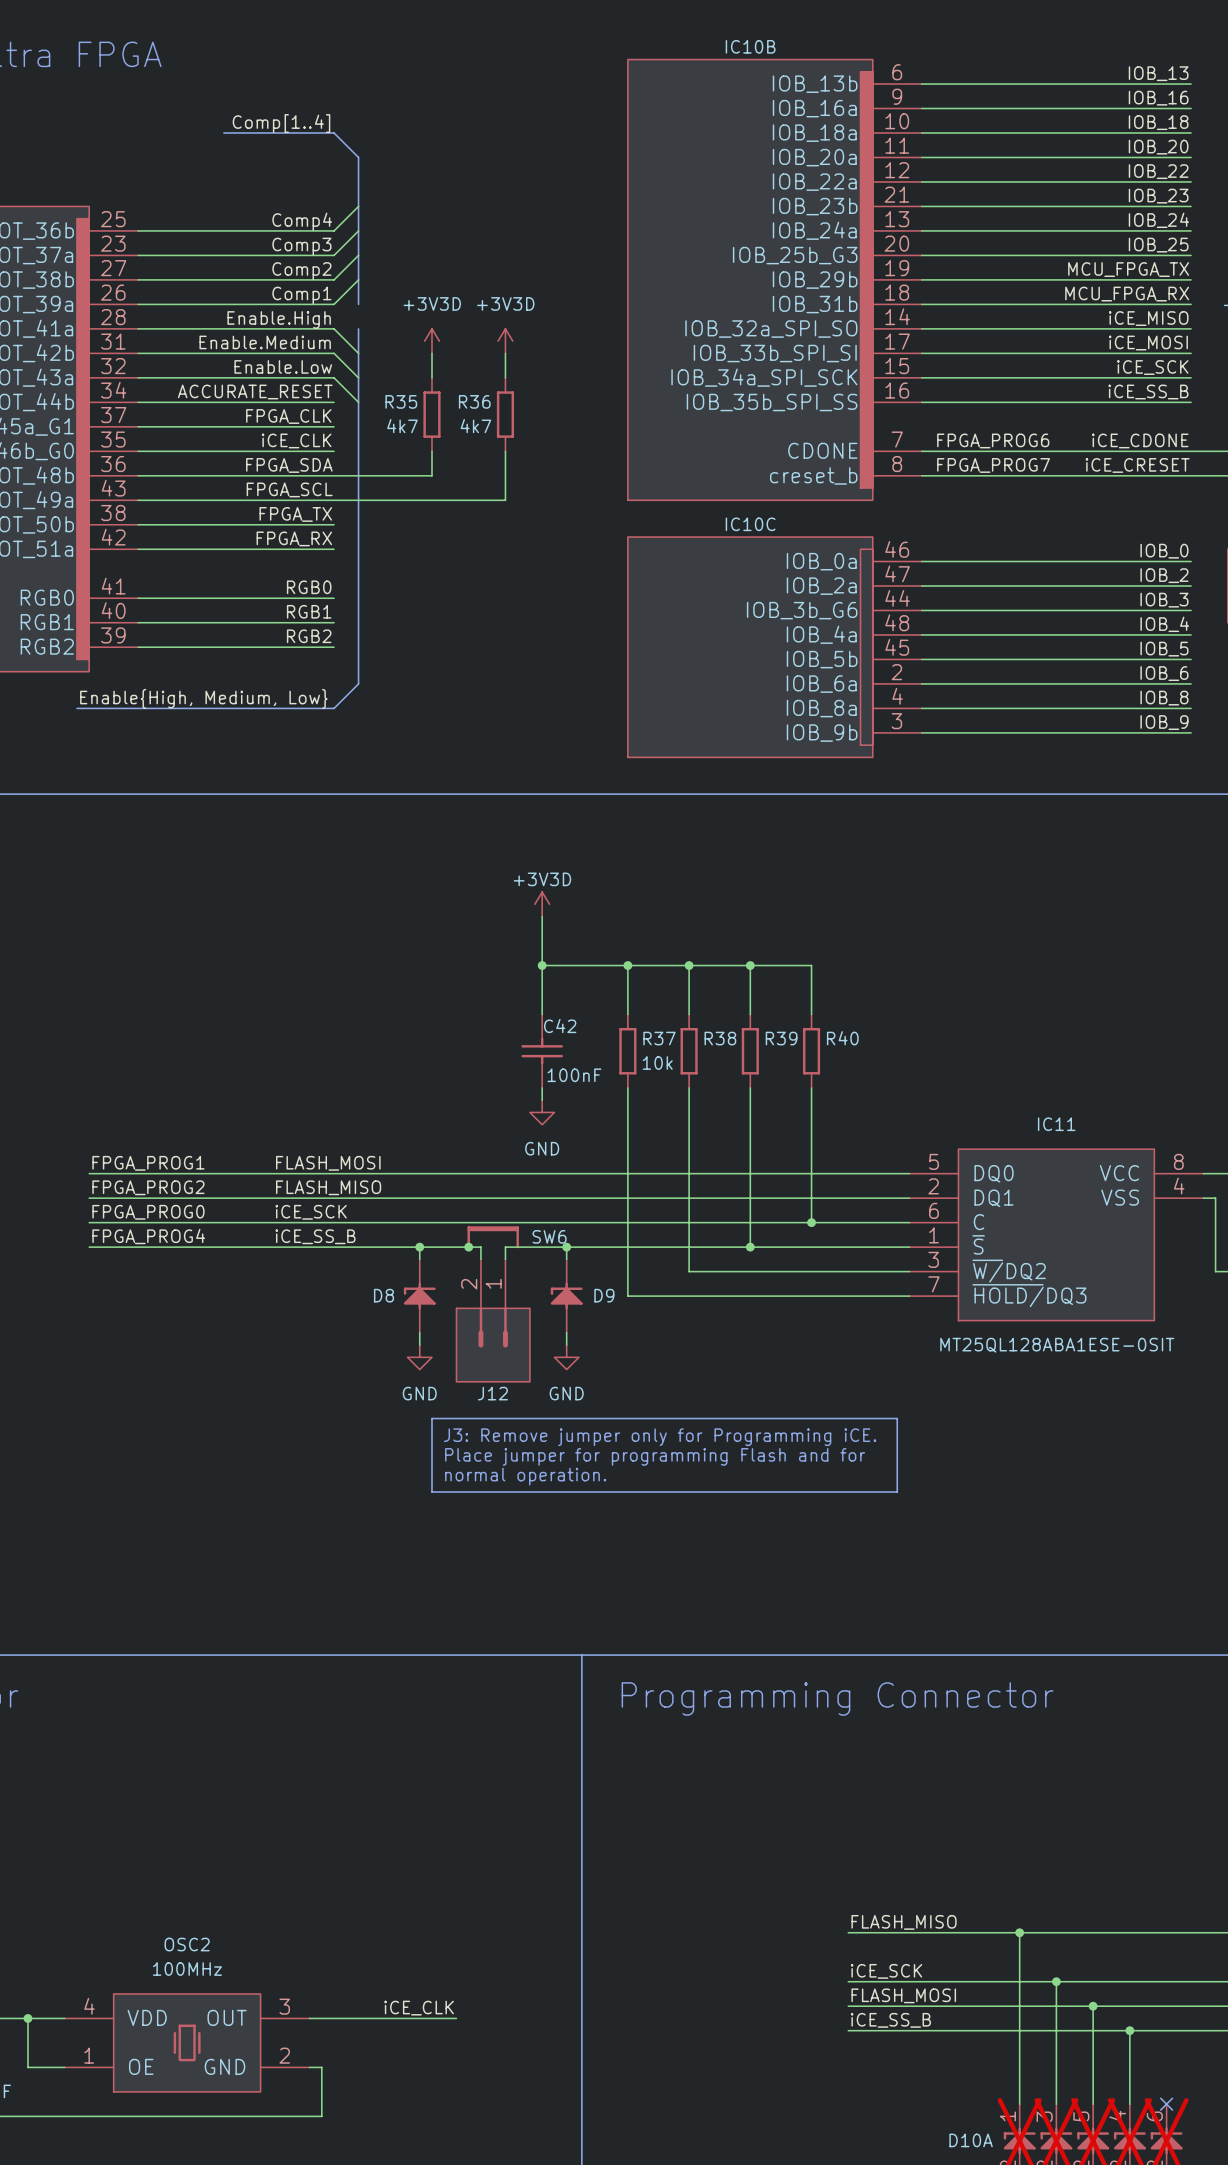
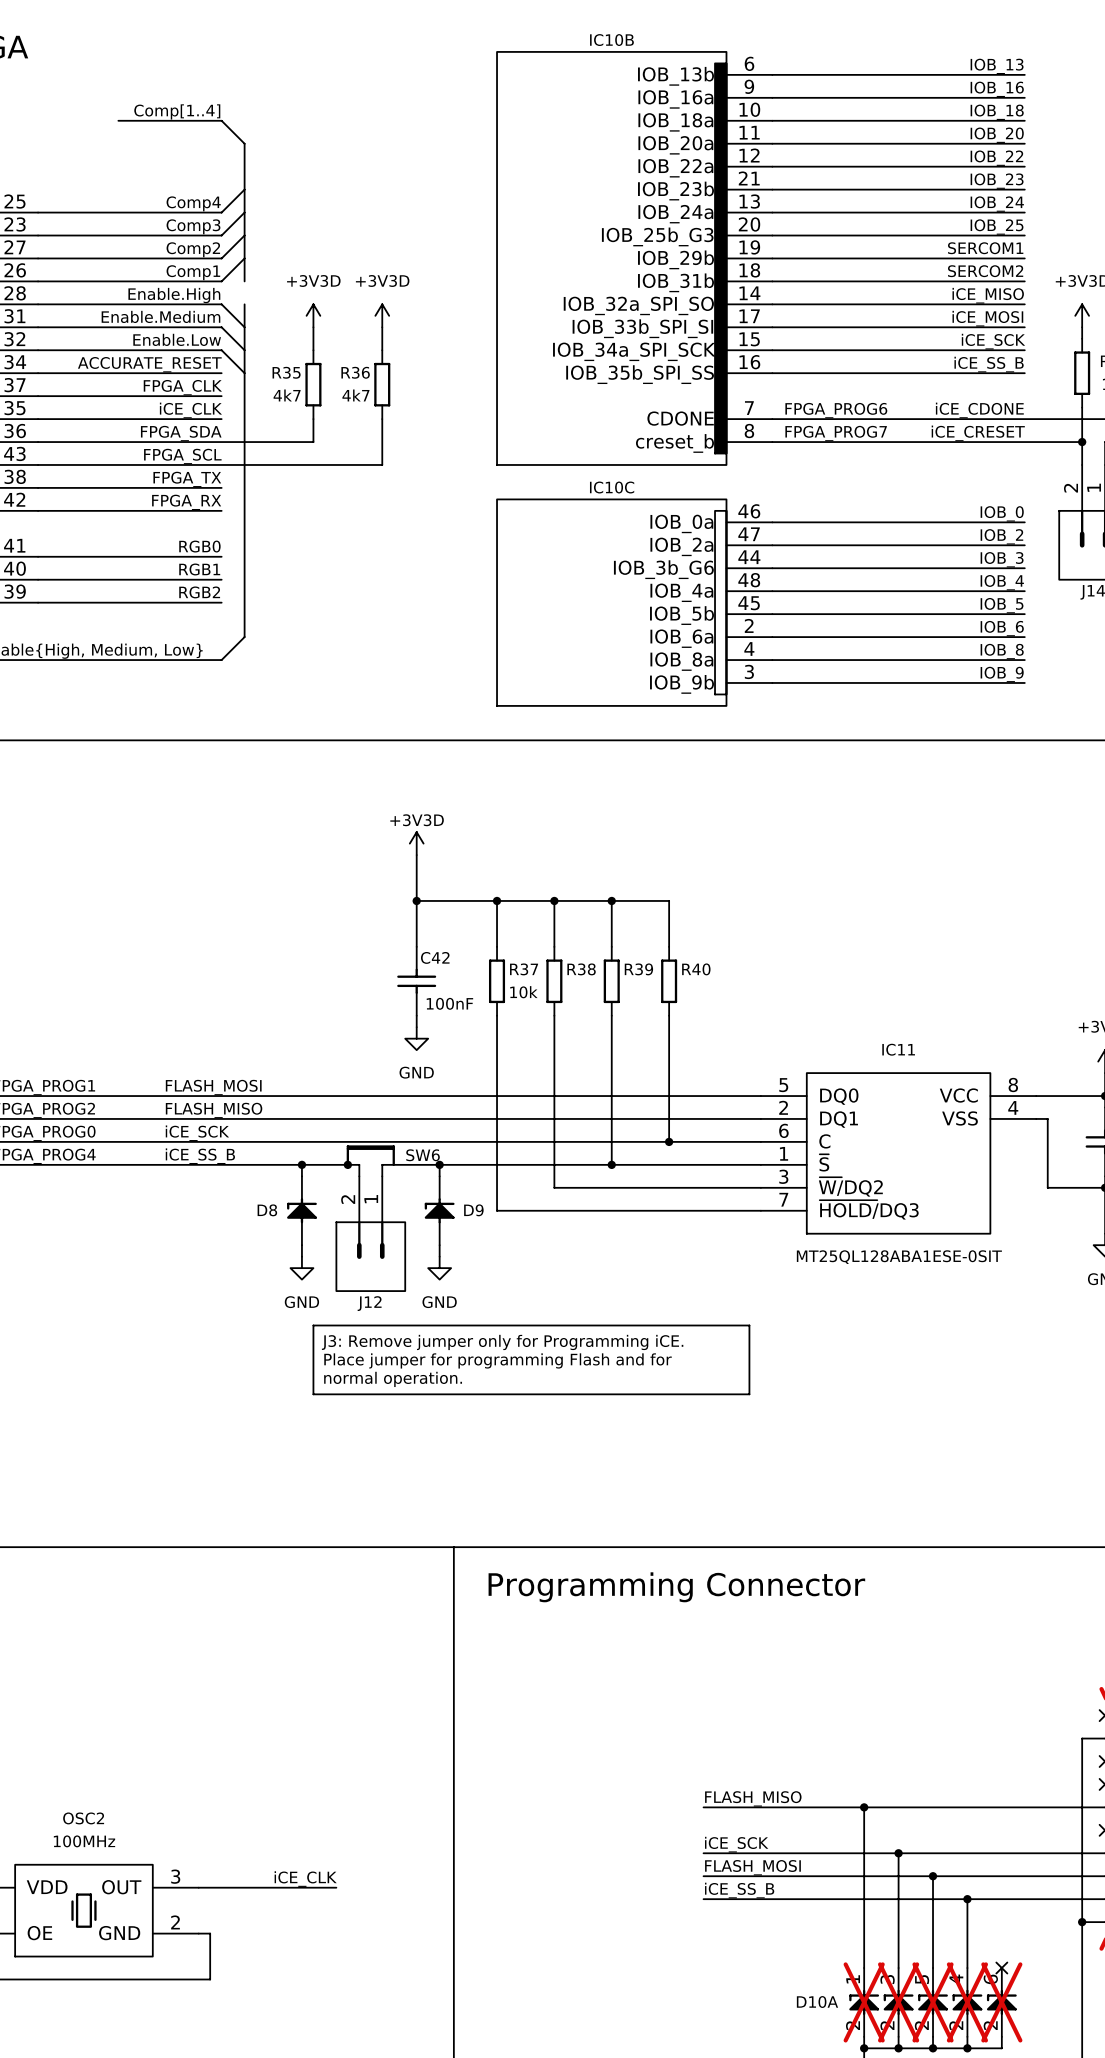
label: MCU_FPGA_TX (1128, 269) -> SERCOM1 (985, 248)
label: MCU_FPGA_RX (1127, 294) -> SERCOM2 (985, 271)

